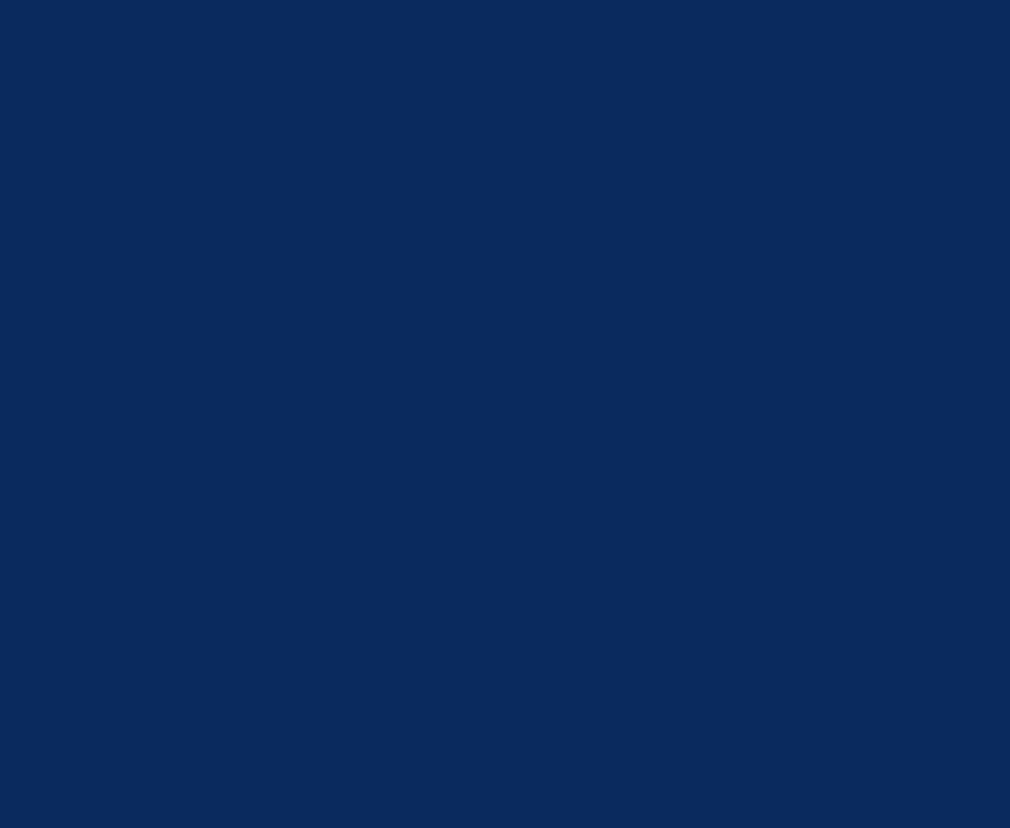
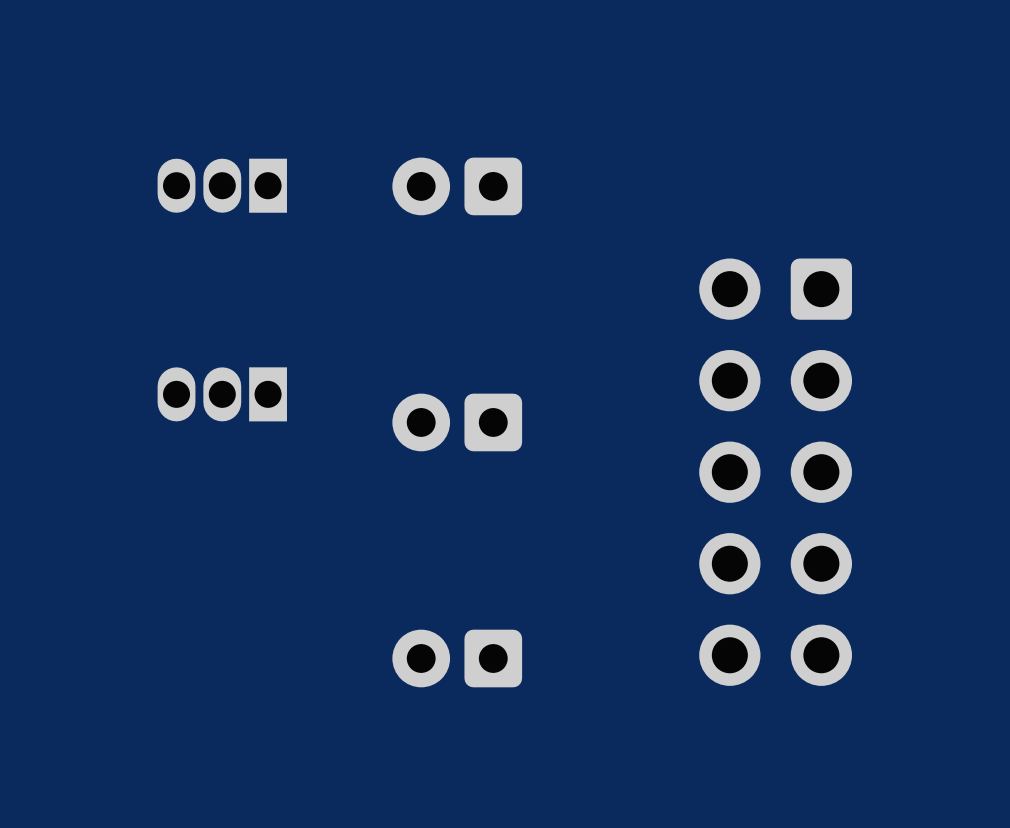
part: none -> (222, 185)
part: none -> (457, 186)
part: none -> (222, 394)
part: none -> (457, 422)
part: none -> (775, 472)
part: none -> (457, 658)

